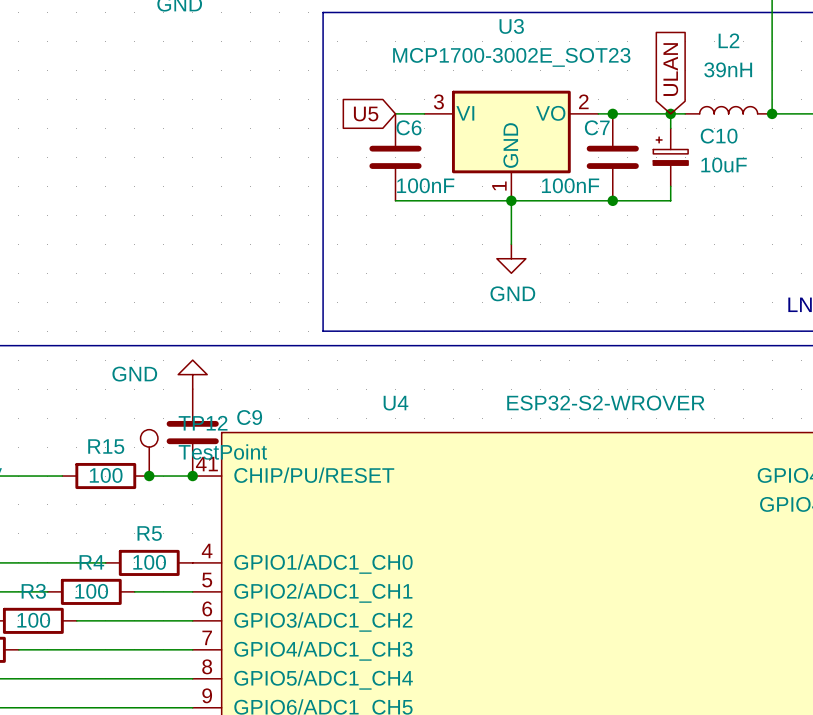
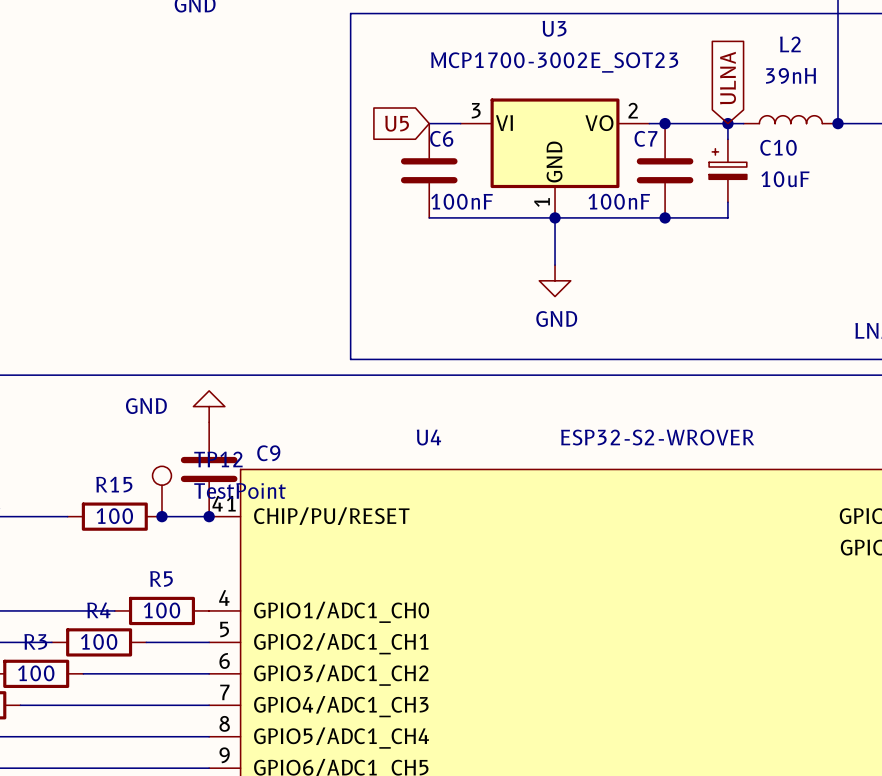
global label: ULAN (670, 69) -> ULNA (728, 78)

